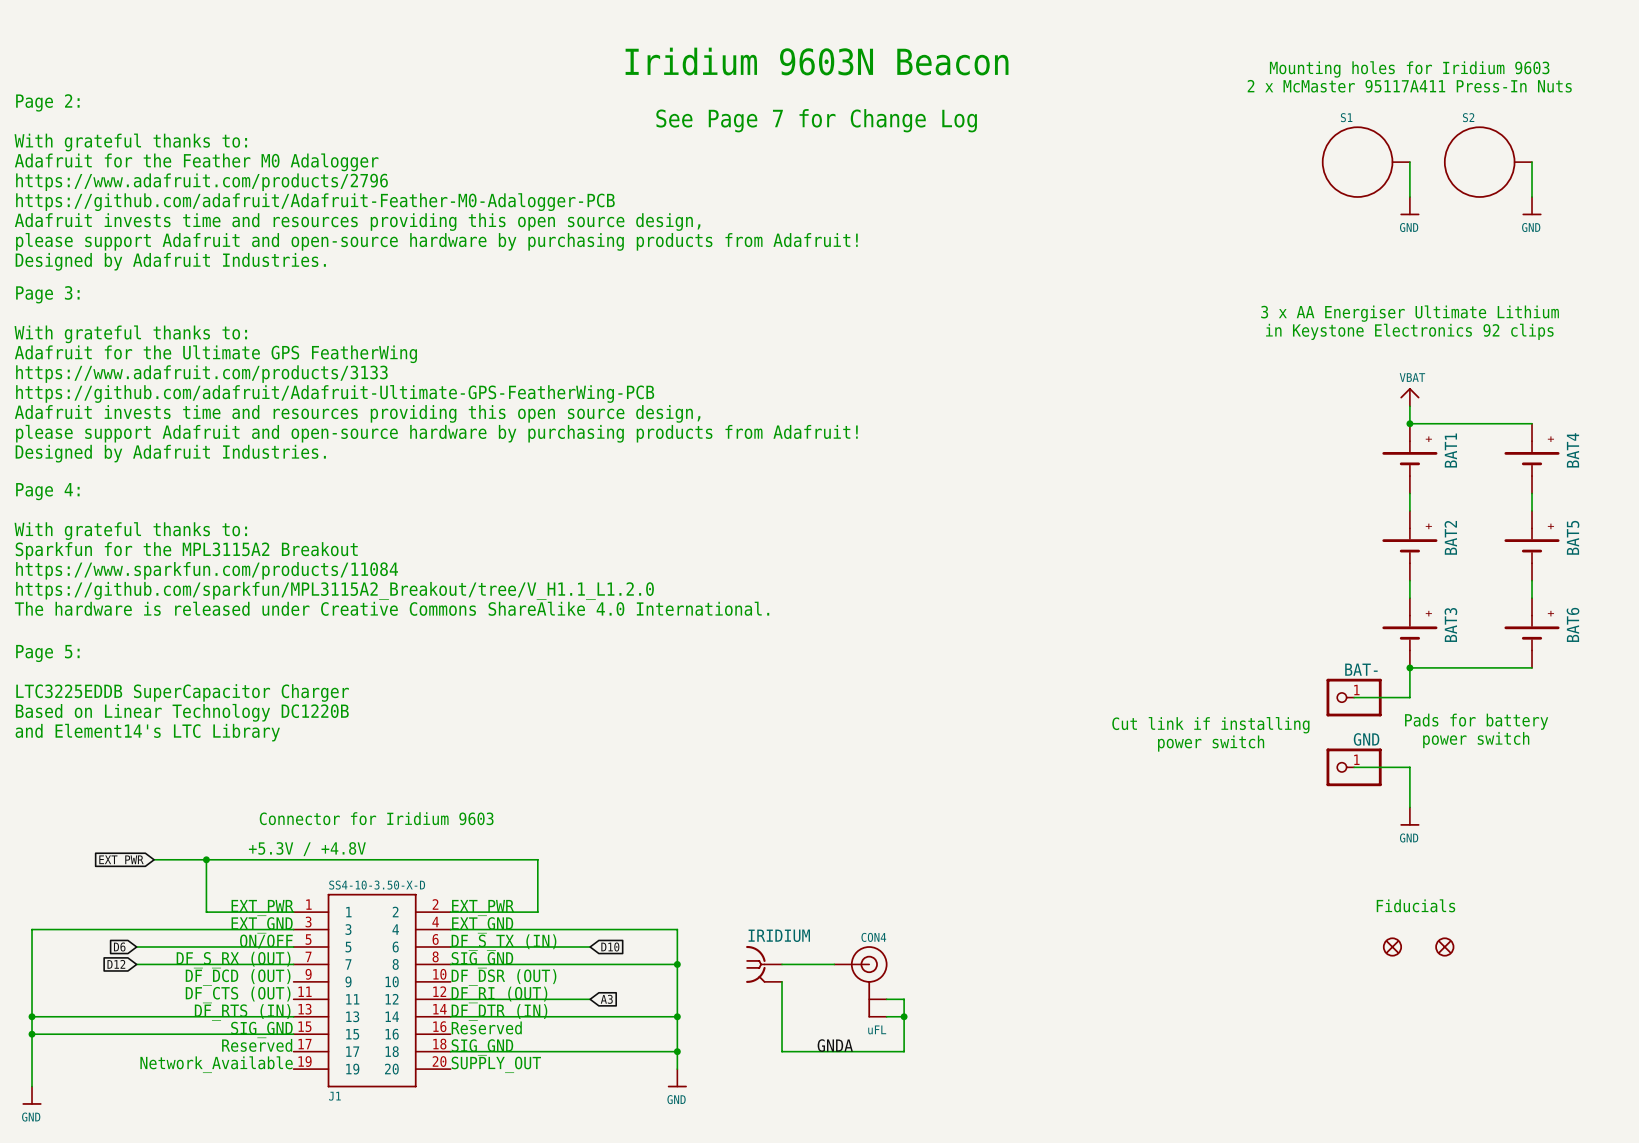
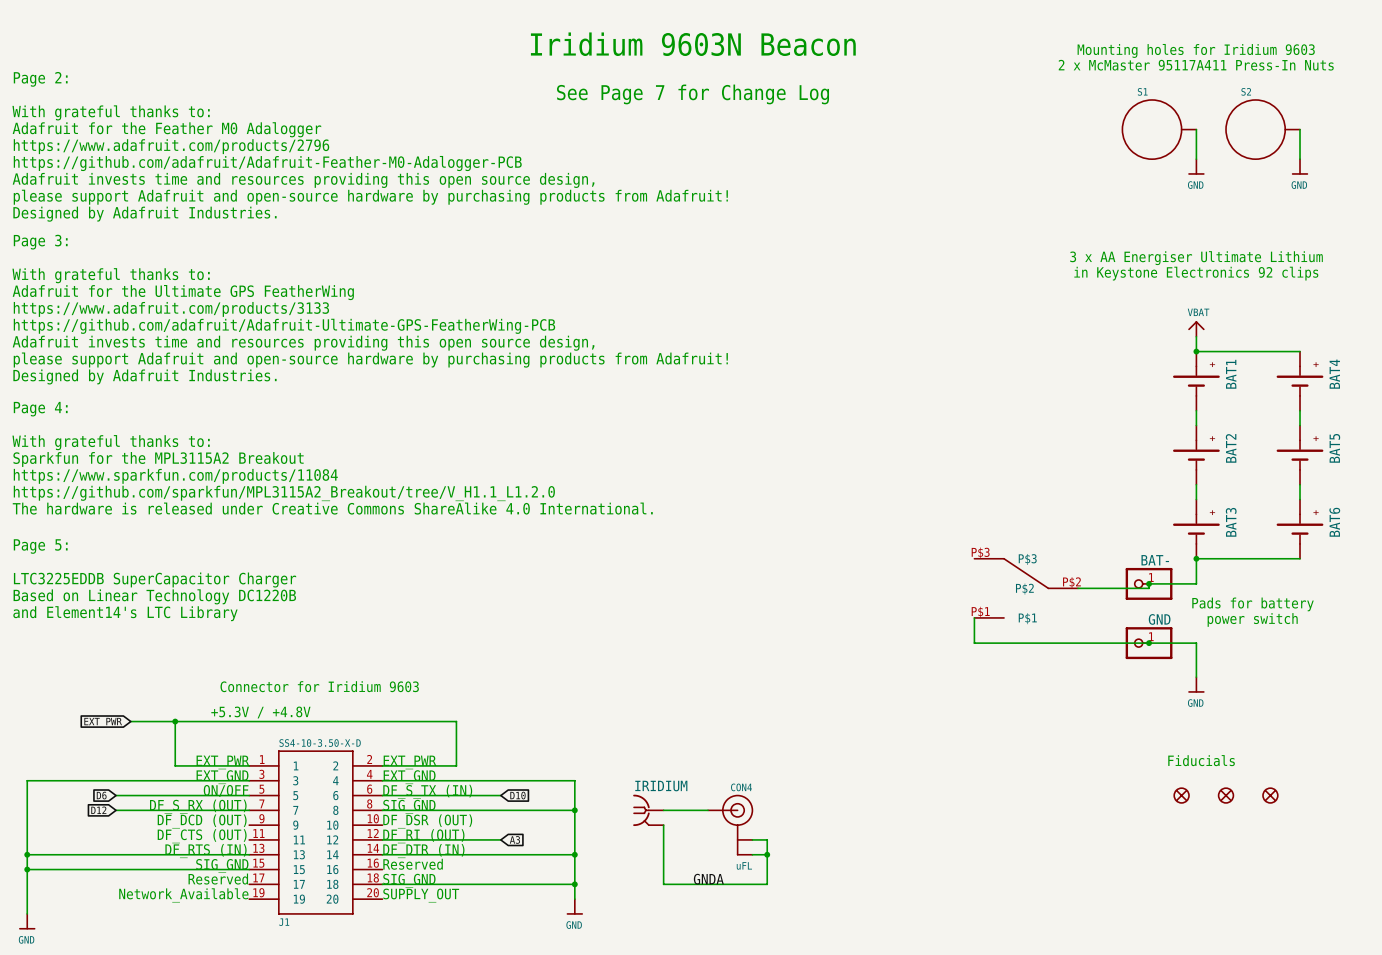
wire: none -> (1149, 583) (1149, 588) (1078, 588)
junction: none -> (1149, 583)
part: none -> (1026, 587)
text: Cut link if installing (1210, 725) -> none
wire: none -> (974, 617) (974, 643) (1149, 643)
text: power switch (1211, 743) -> none
junction: none -> (1149, 643)
part: none -> (1270, 795)

